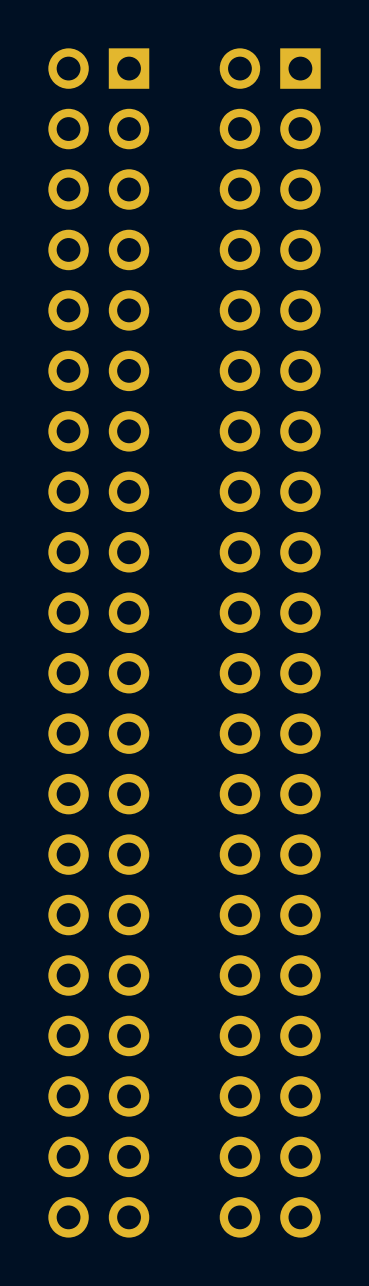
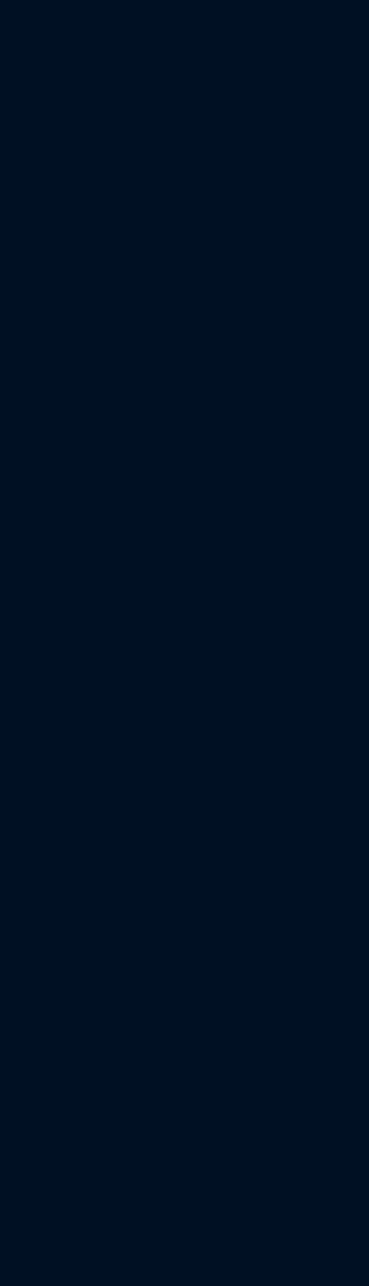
part: (98, 642) -> none
part: (270, 642) -> none

